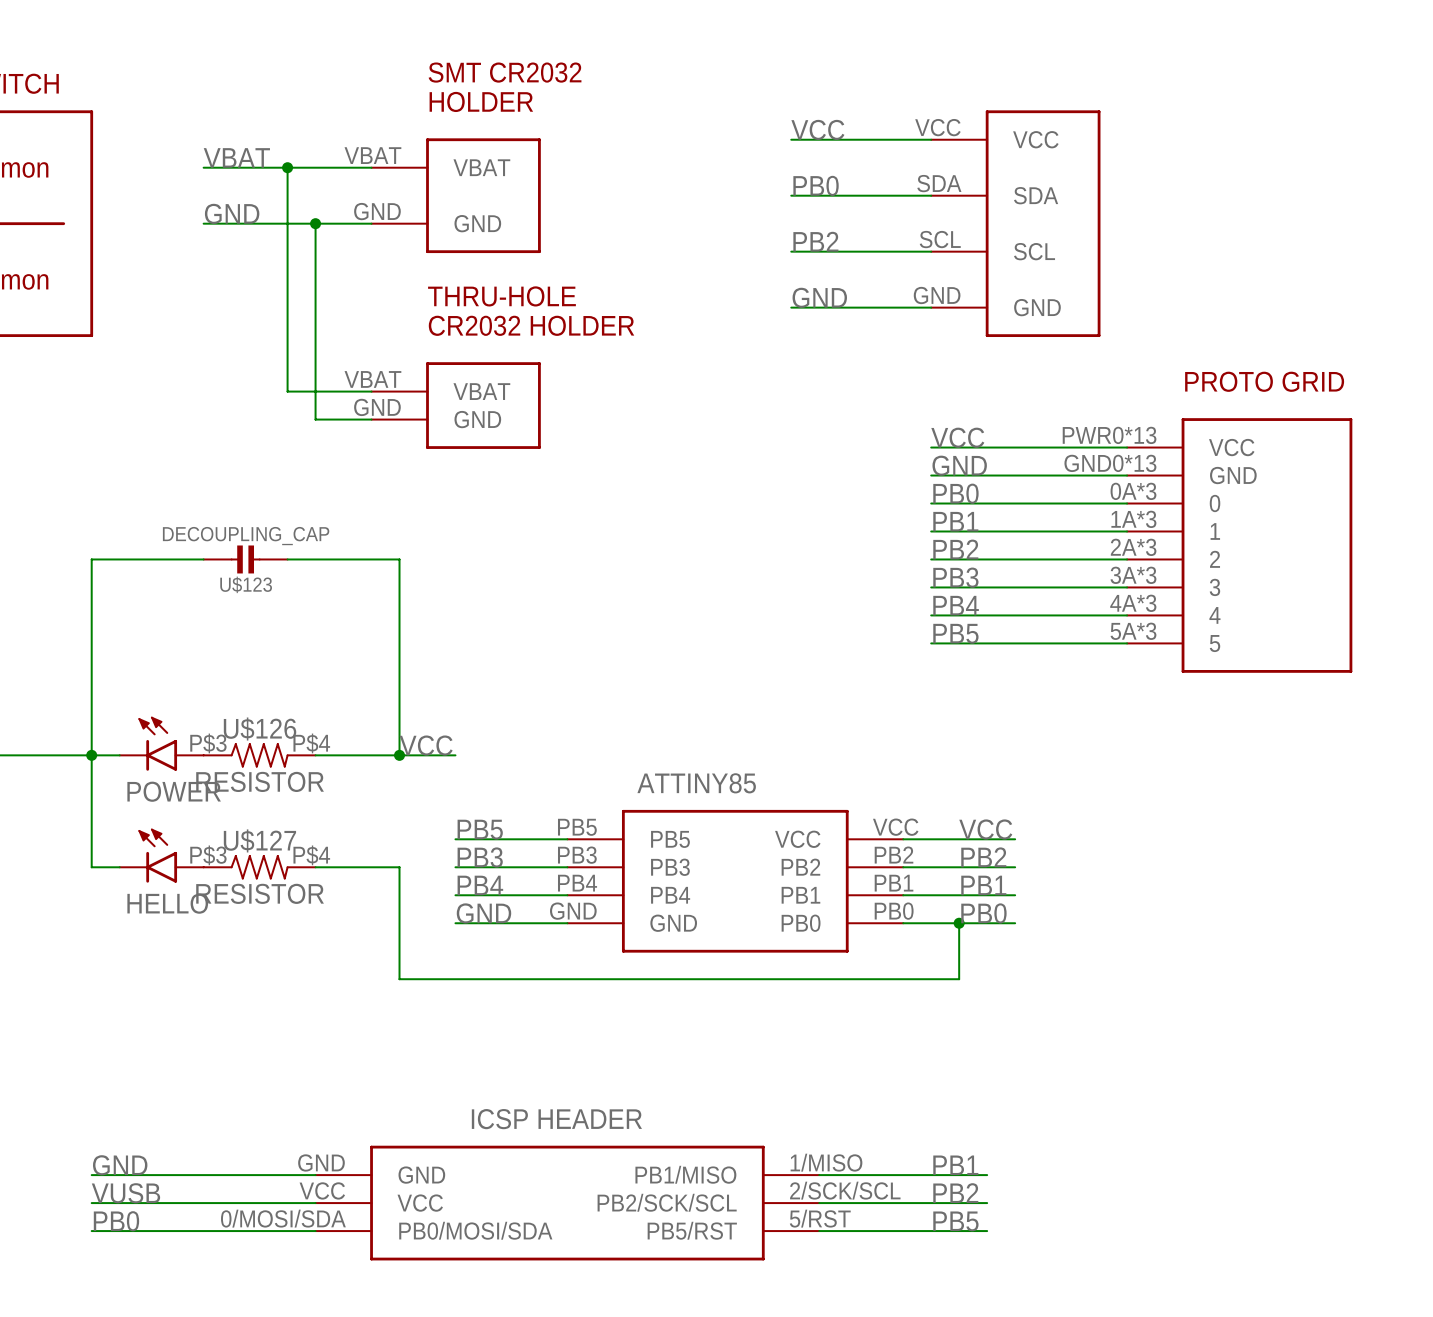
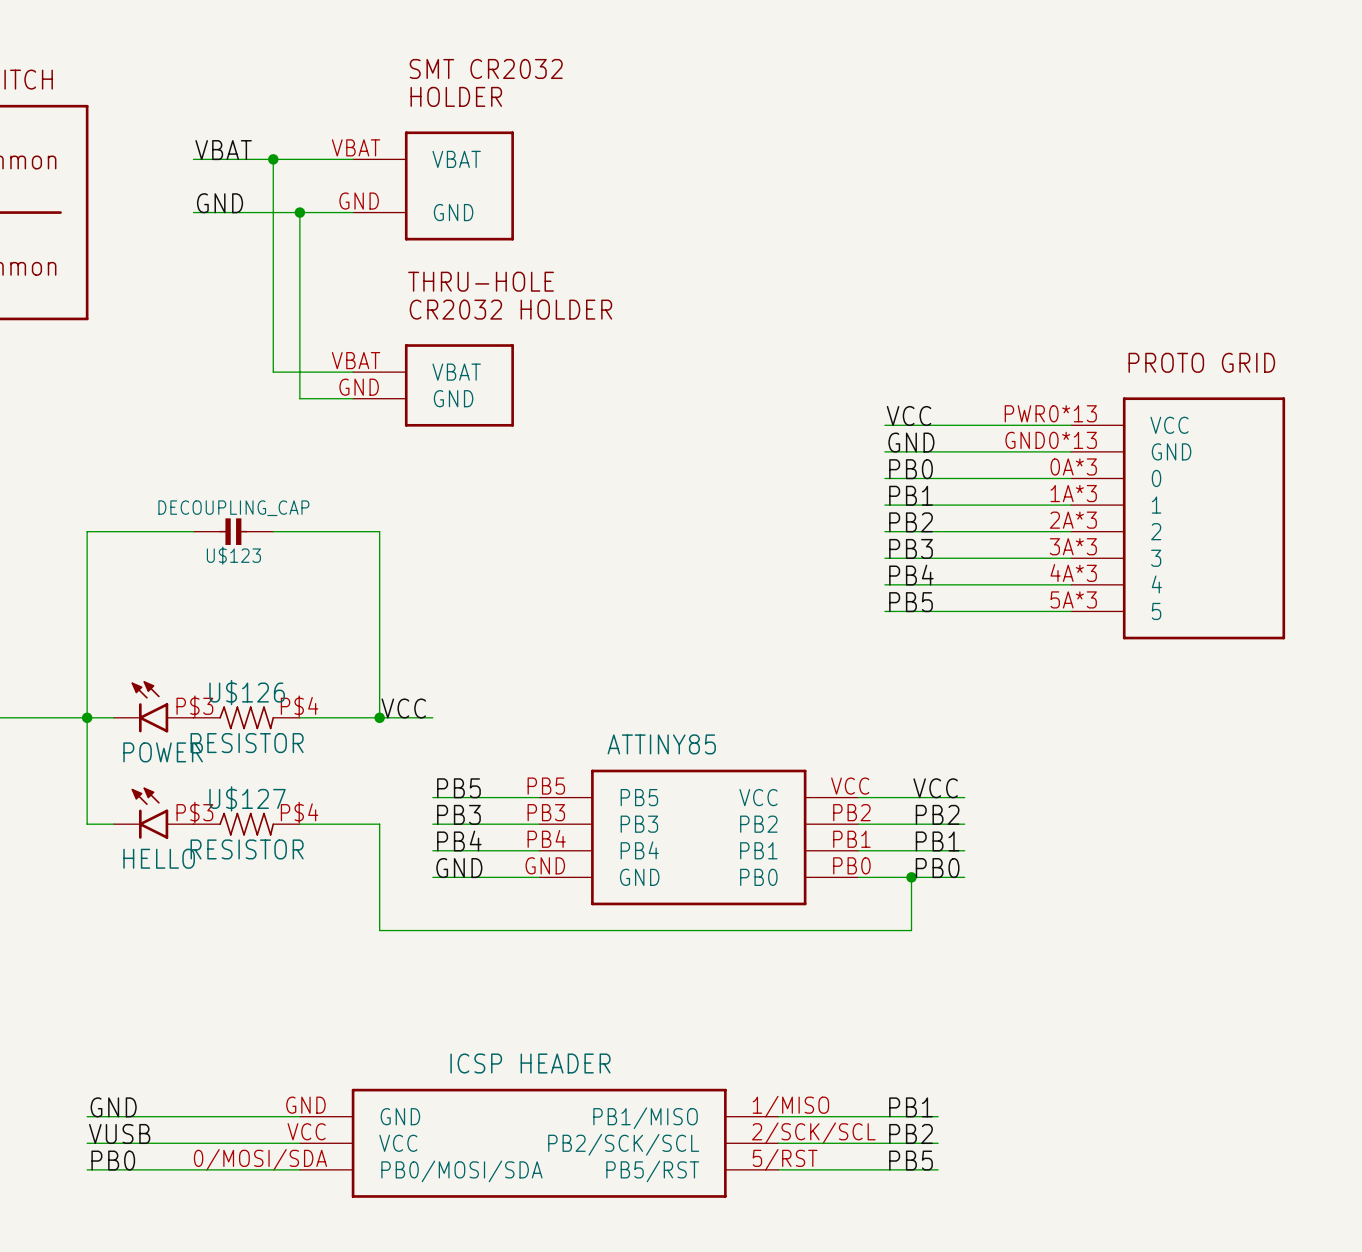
label: VCC (817, 129) -> none
wire: (791, 139) (931, 139) -> none
label: PB0 (816, 185) -> none
wire: (791, 195) (931, 195) -> none
part: (1015, 223) -> none
label: PB2 (815, 241) -> none
wire: (791, 251) (931, 251) -> none
label: GND (819, 297) -> none
wire: (791, 307) (931, 307) -> none

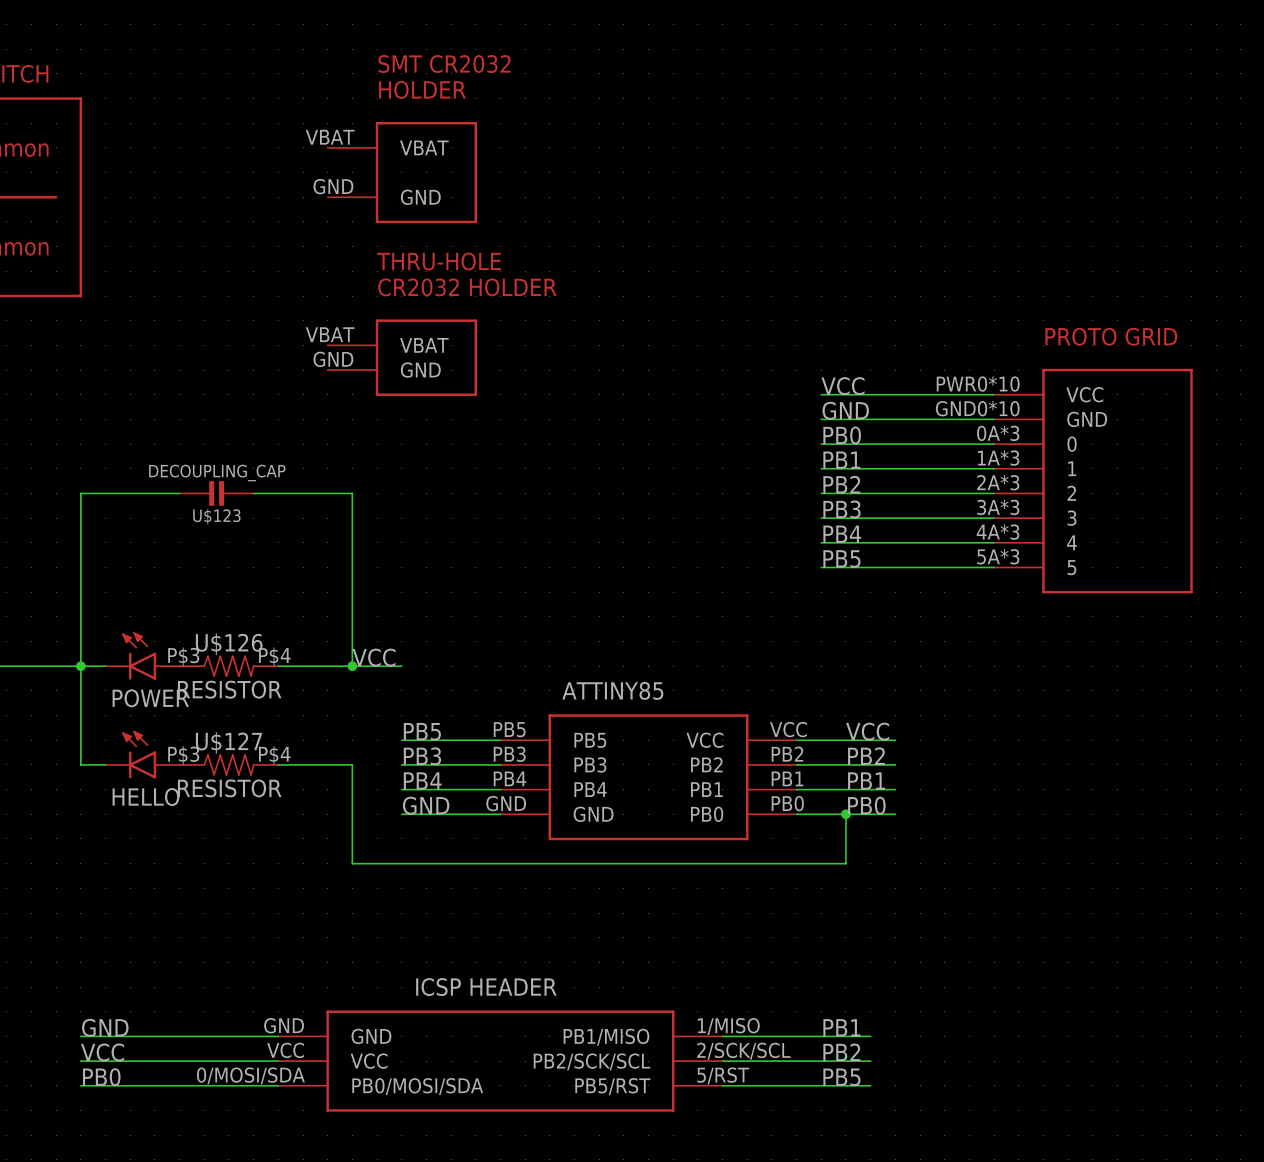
label: VBAT (223, 150) -> none
wire: (193, 159) (353, 159) -> none
wire: (273, 159) (273, 372) (353, 372) -> none
junction: (273, 159) -> none
label: GND (220, 203) -> none
wire: (193, 212) (353, 212) -> none
wire: (299, 212) (299, 398) (353, 398) -> none
junction: (299, 212) -> none
part pin number: PWR0*13 (1050, 413) -> PWR0*10 (978, 384)
part pin number: GND0*13 (1051, 440) -> GND0*10 (977, 408)
label: VUSB (119, 1133) -> VCC (102, 1052)

